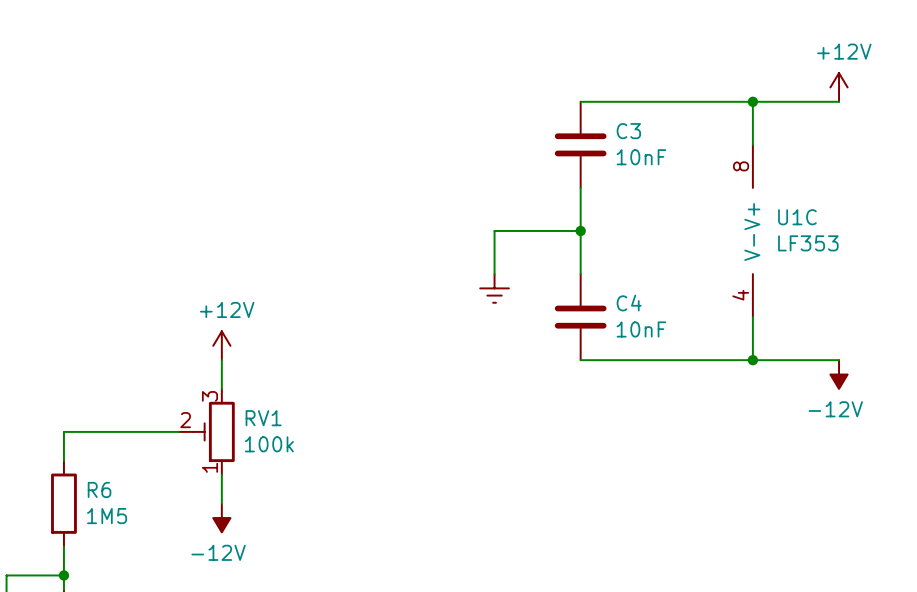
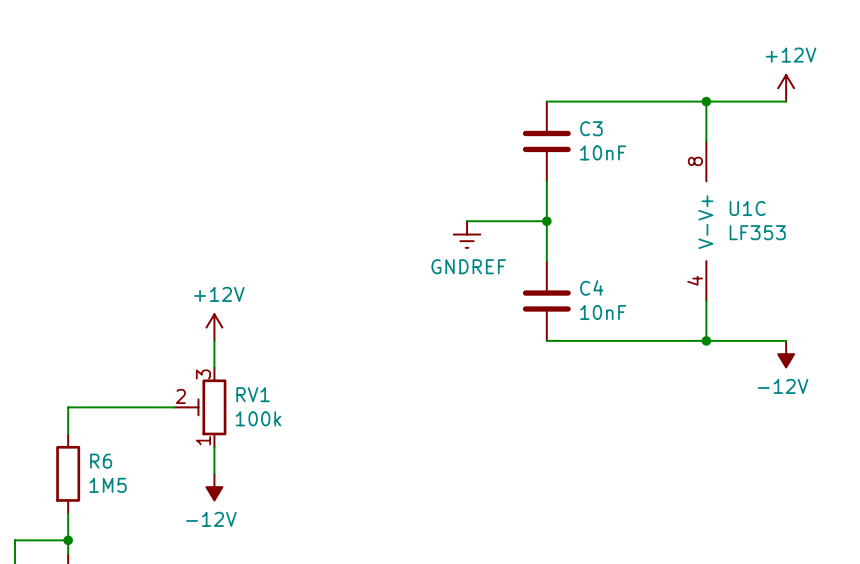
wire: (494, 230) (494, 274) -> none
power symbol: none -> GNDREF (467, 234)
power symbol: (494, 288) -> none

